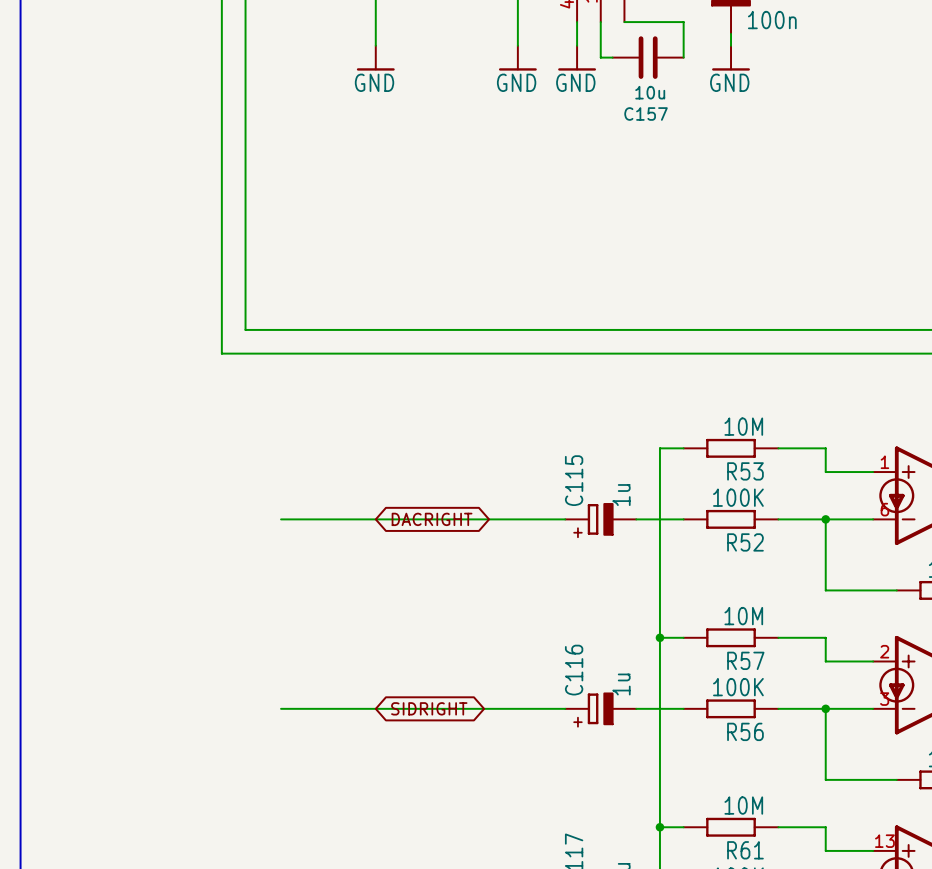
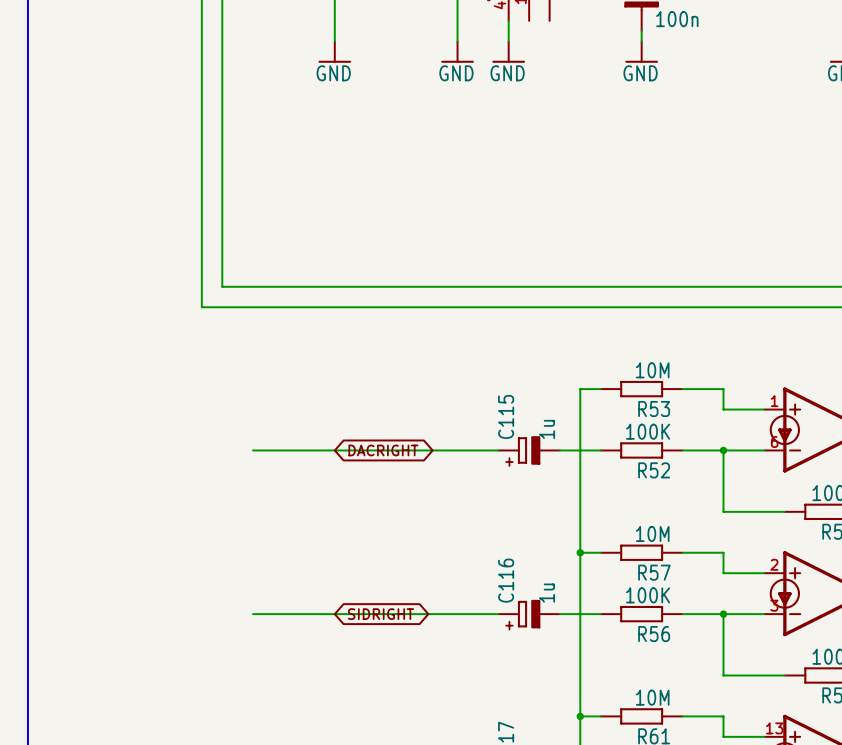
wire: (600, 22) (600, 57) (612, 57) -> none
wire: (624, 22) (683, 22) (683, 57) -> none
C157: 10u (648, 57) -> none

